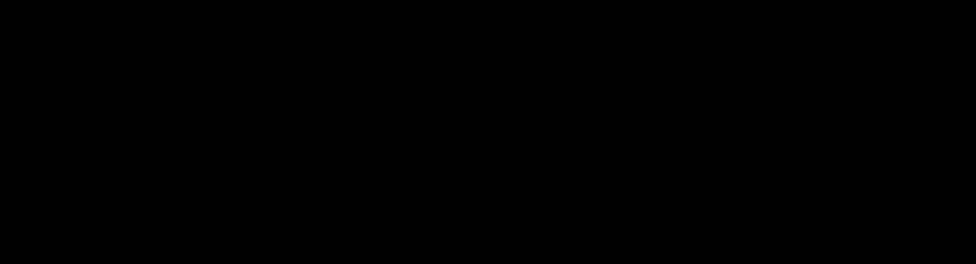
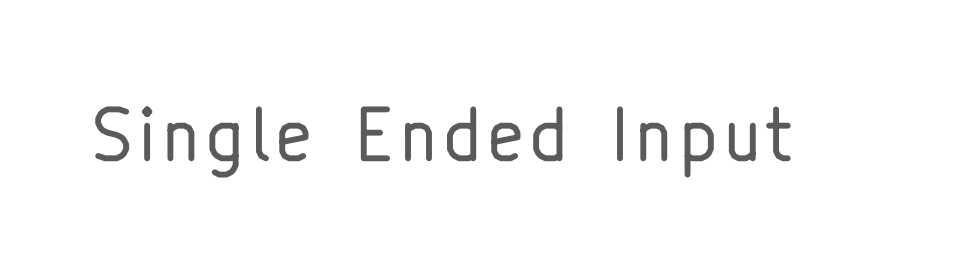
text: none -> Single Ended Input (442, 141)

